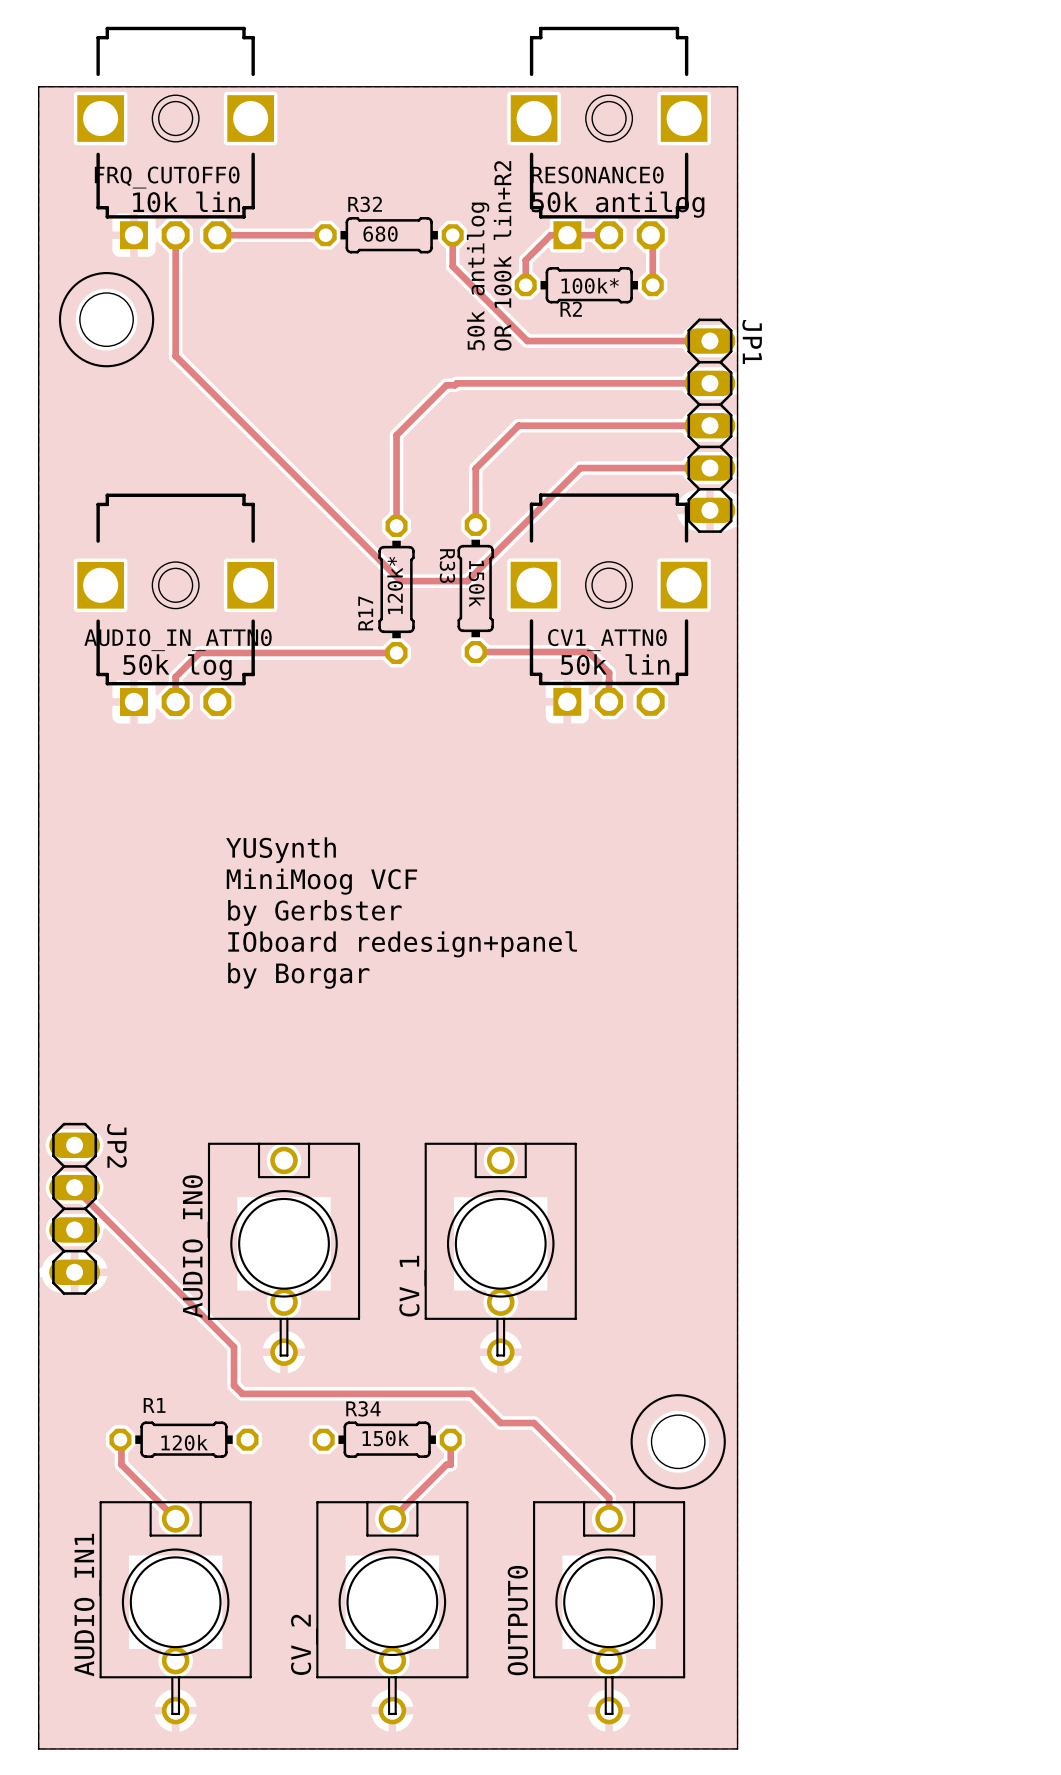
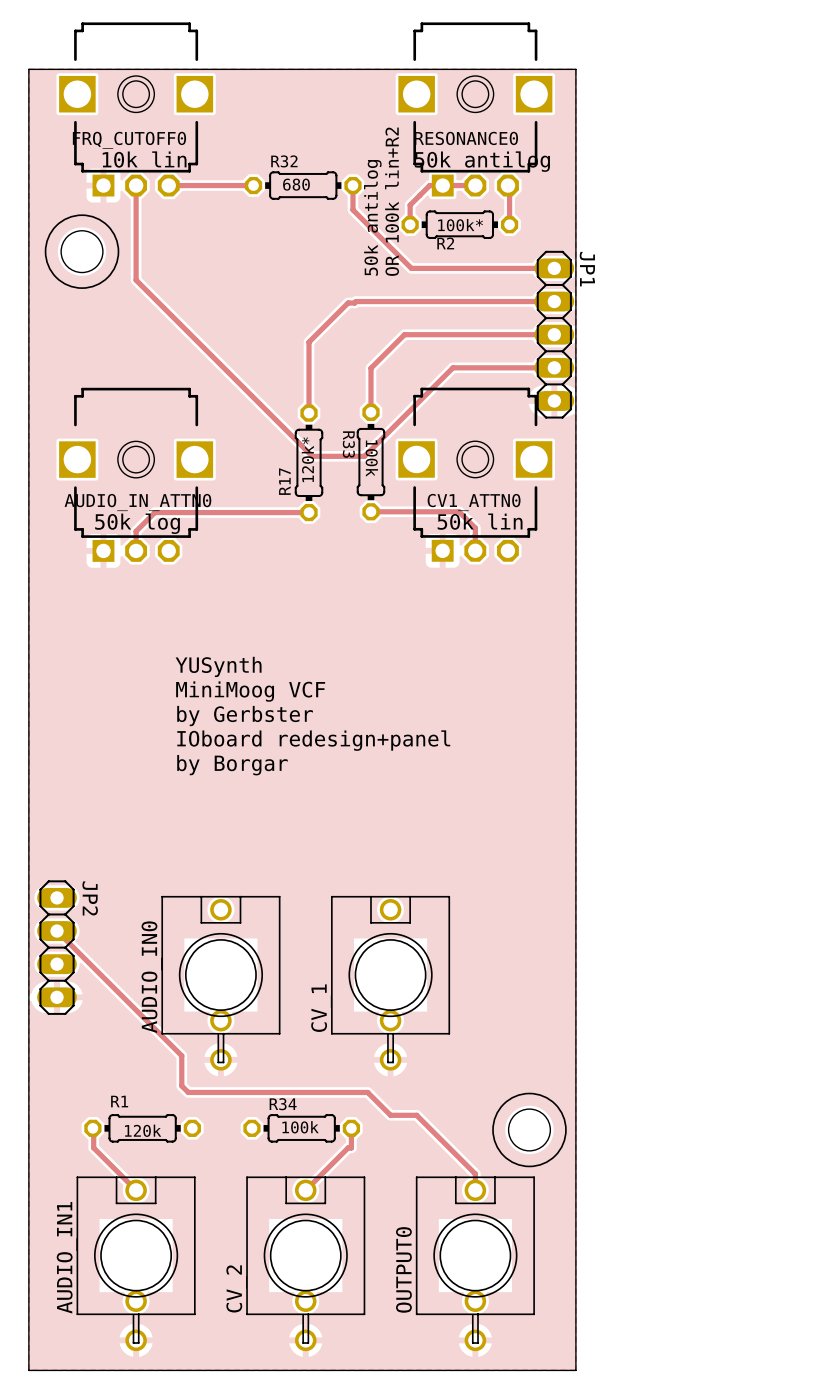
R33 value: 150k (476, 583) -> 100k (371, 458)
R34 value: 150k (385, 1438) -> 100k (300, 1127)

